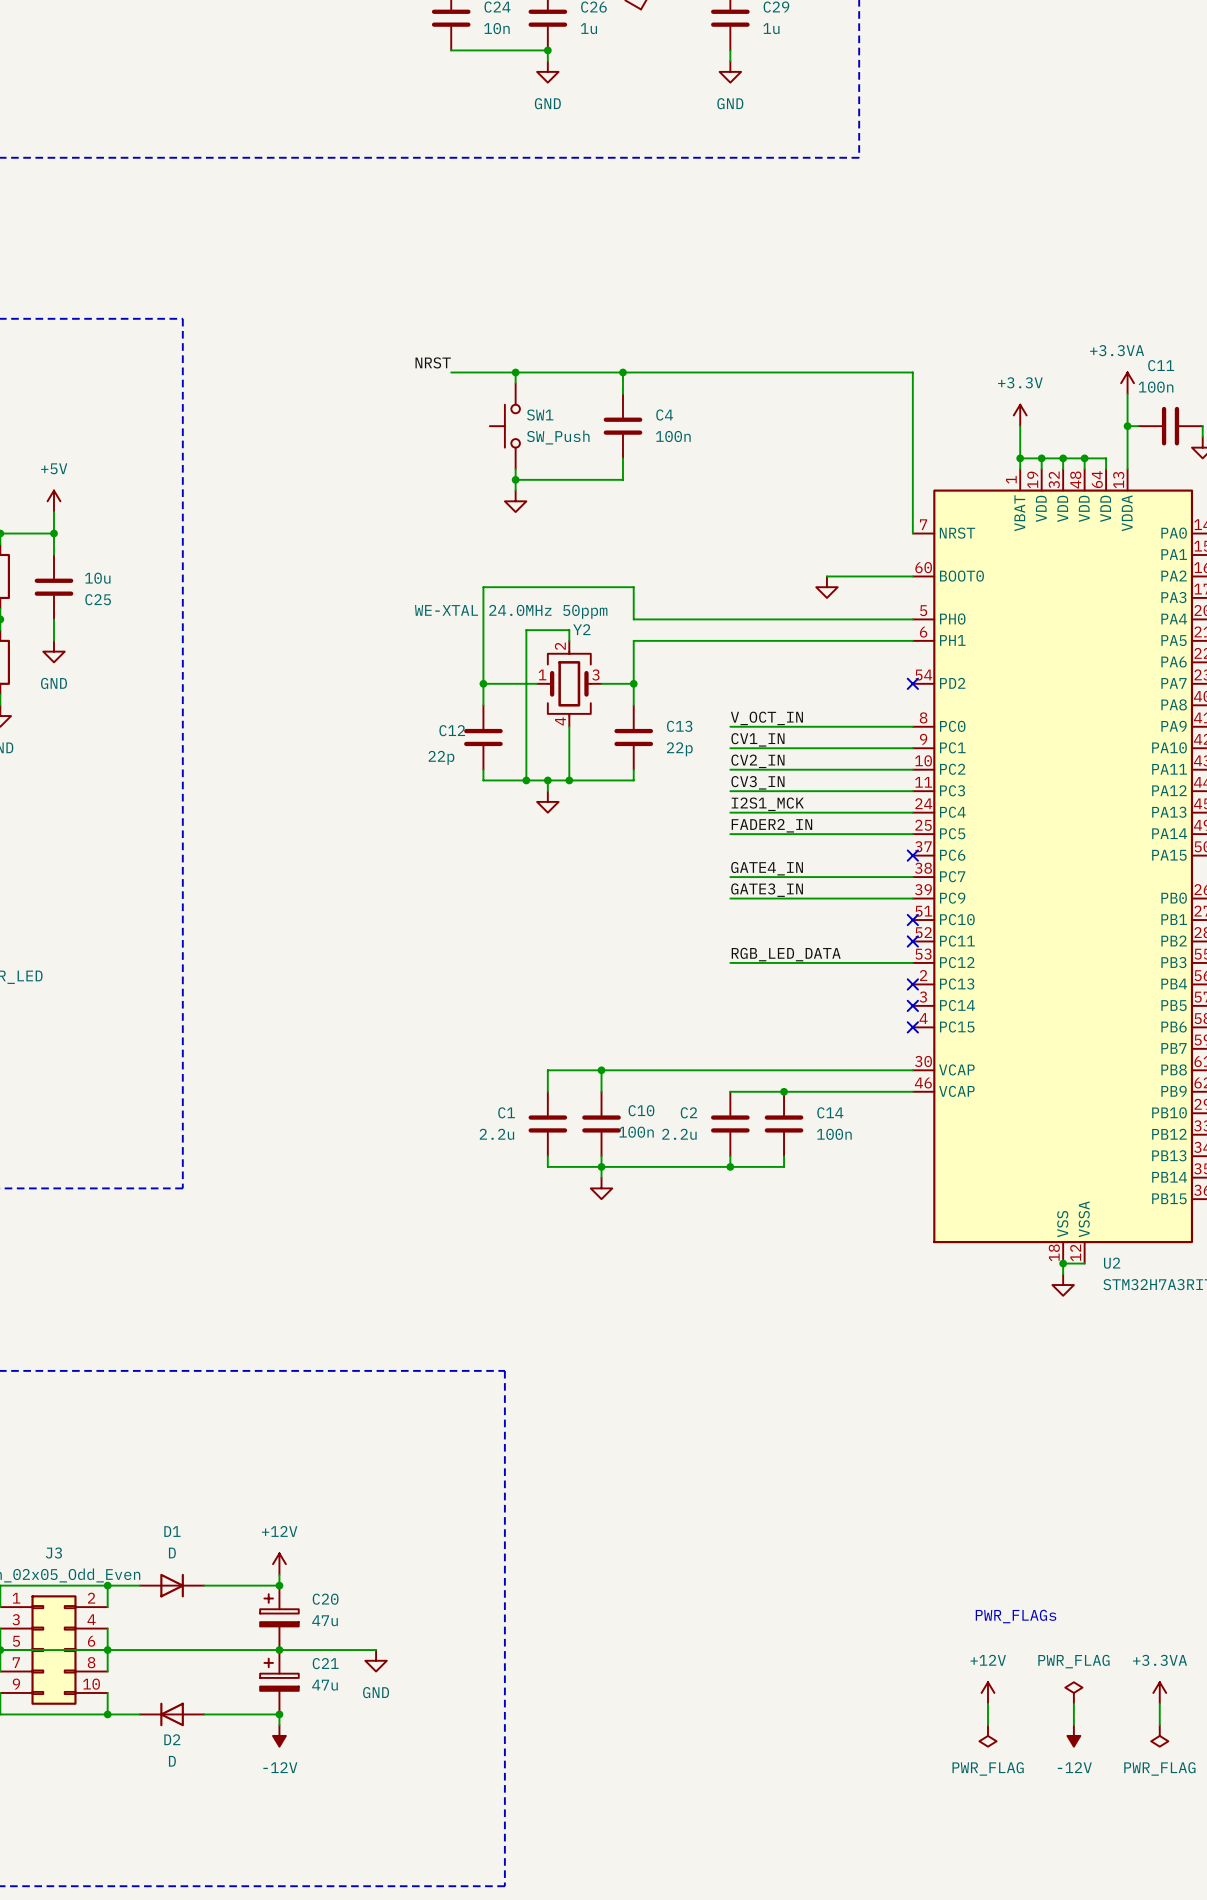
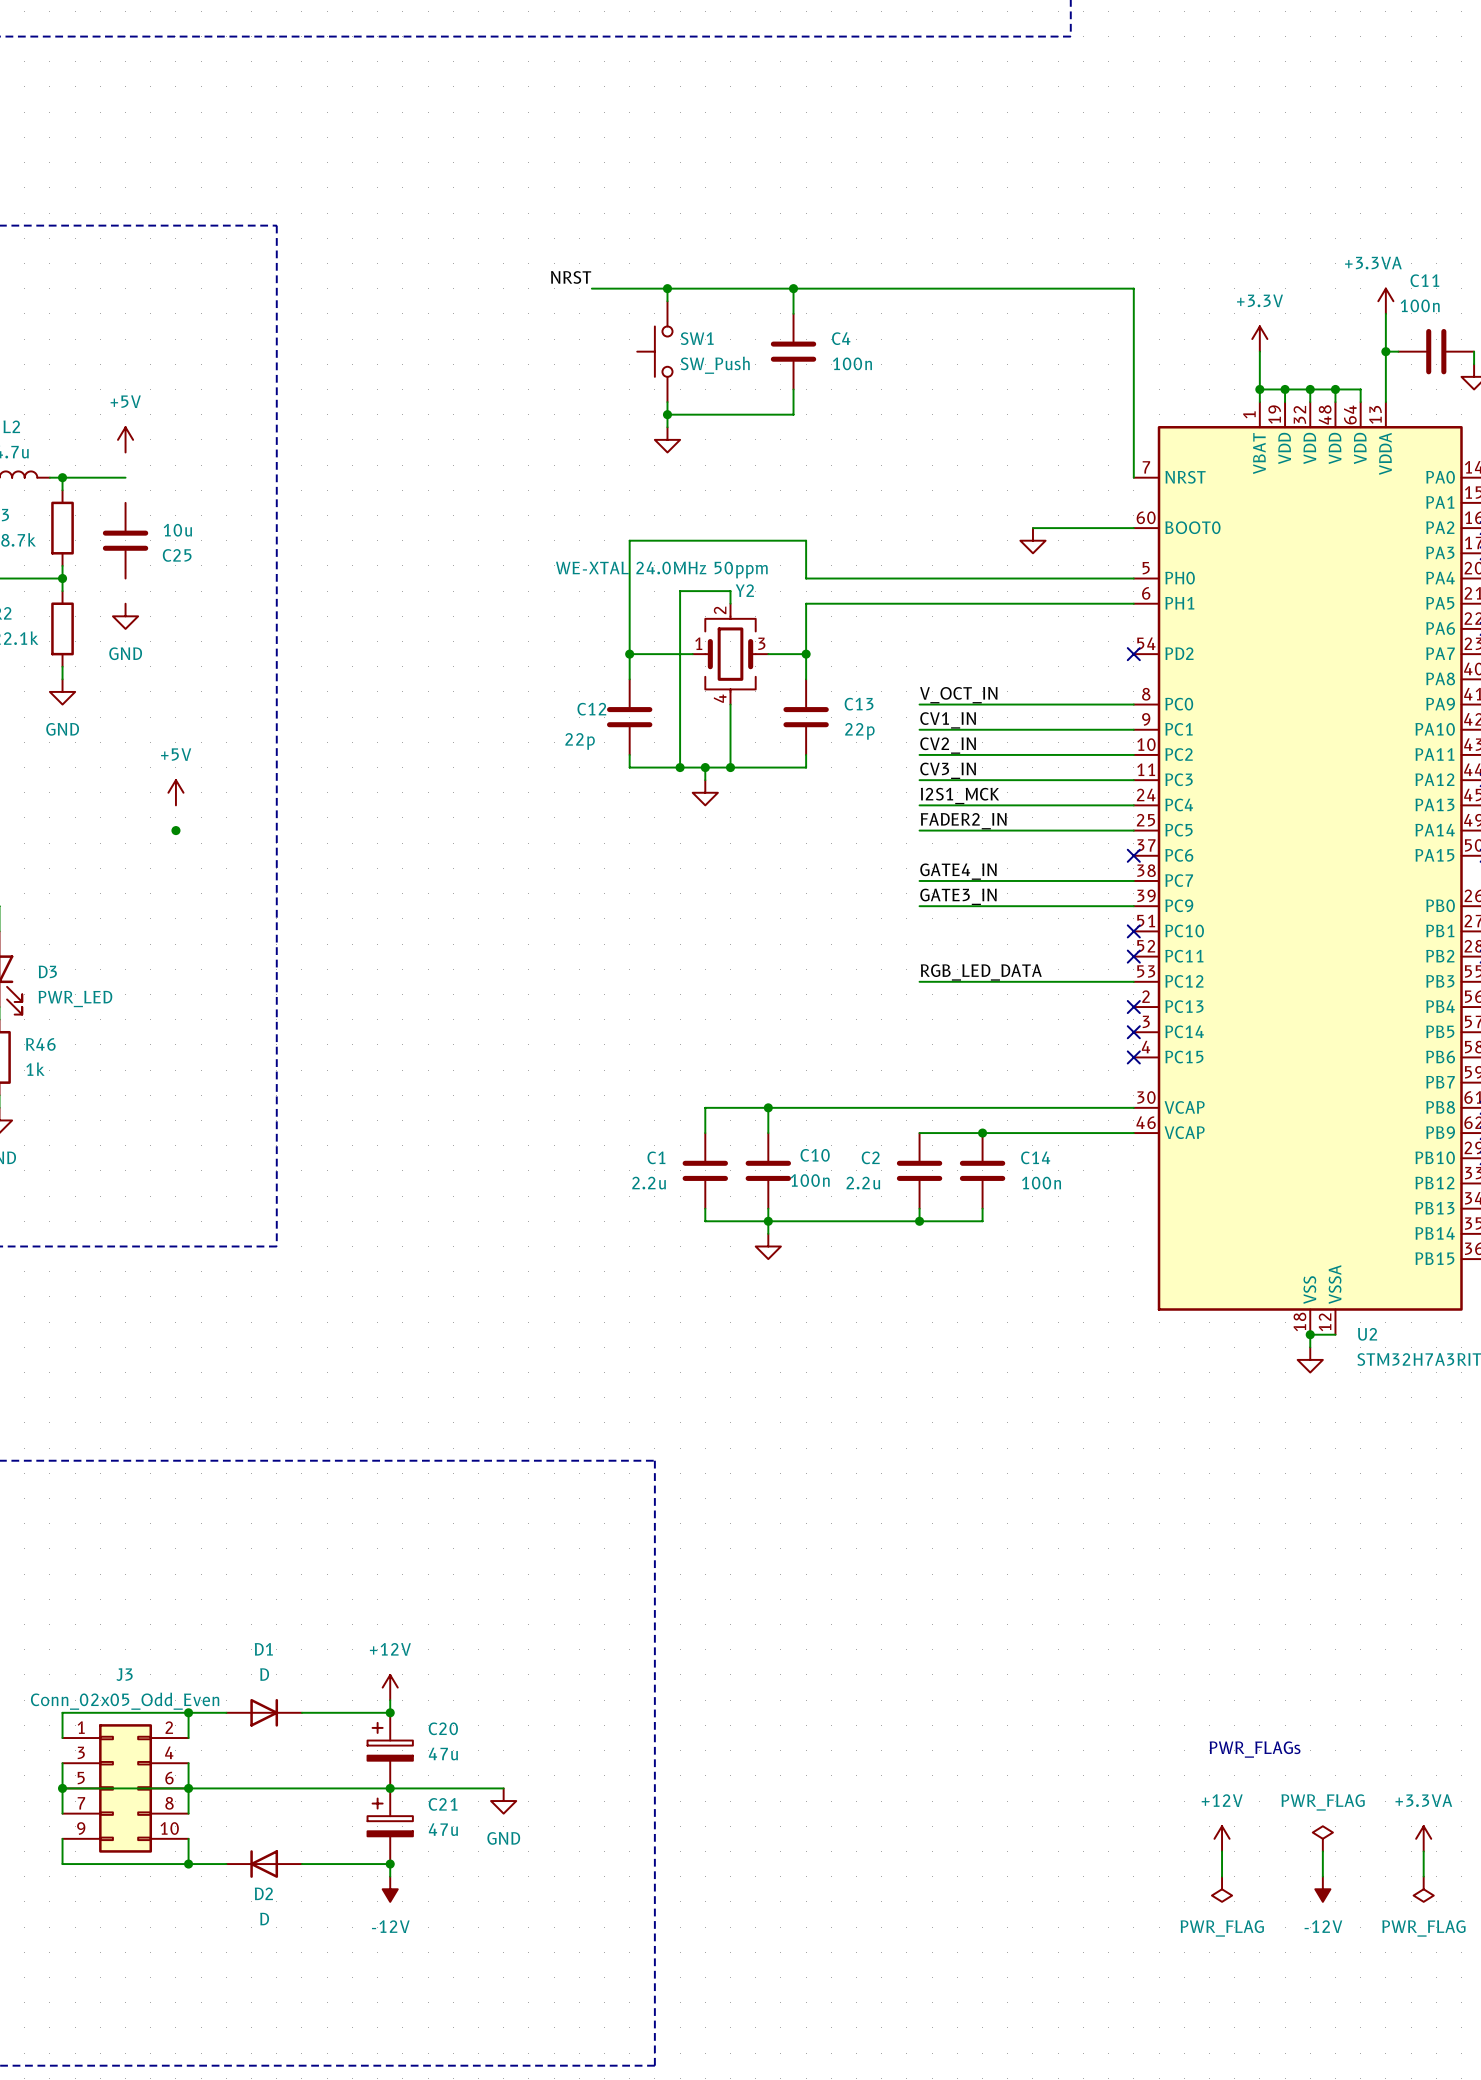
wire: (53, 512) (53, 555) -> none
junction: (53, 533) -> none
wire: (53, 619) (53, 640) -> none
power symbol: none -> +5V (175, 792)
junction: none -> (175, 830)

